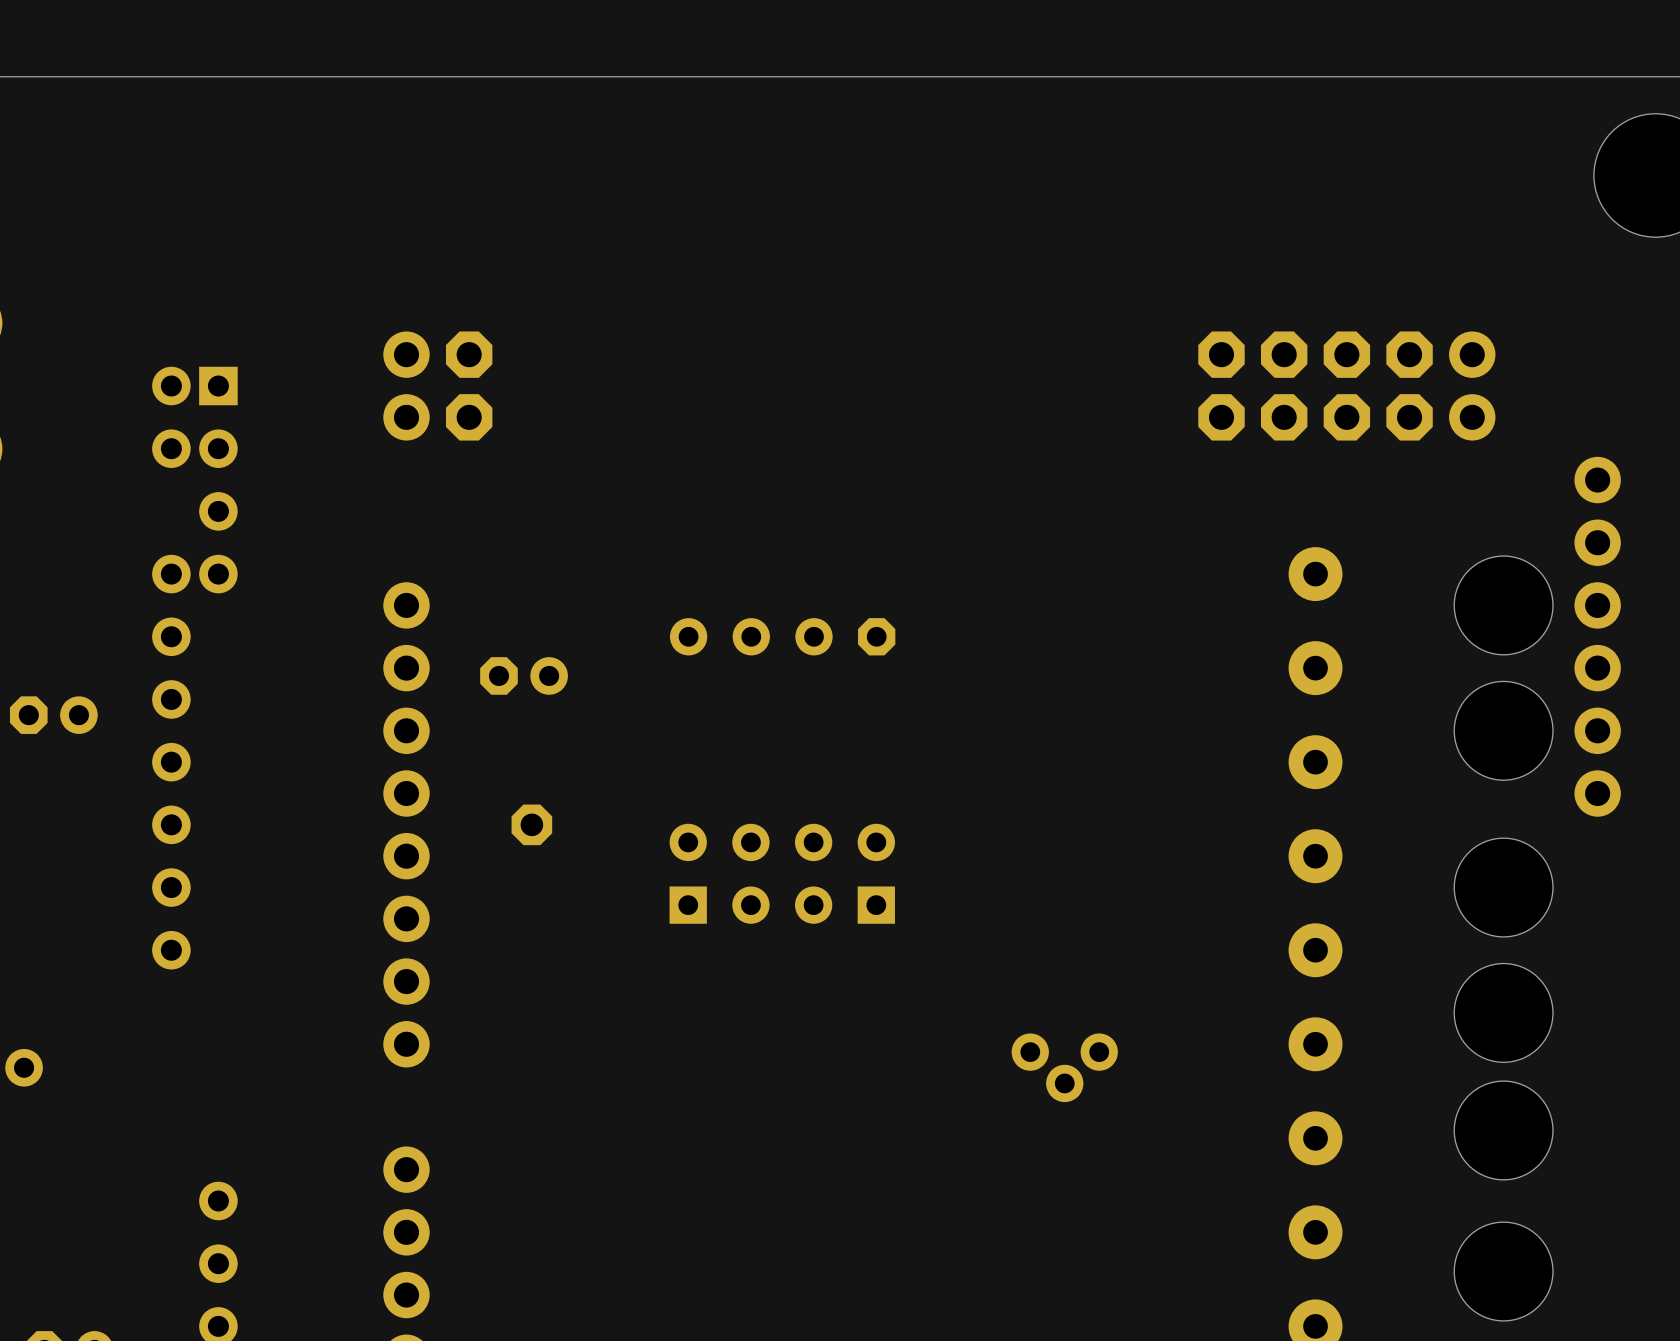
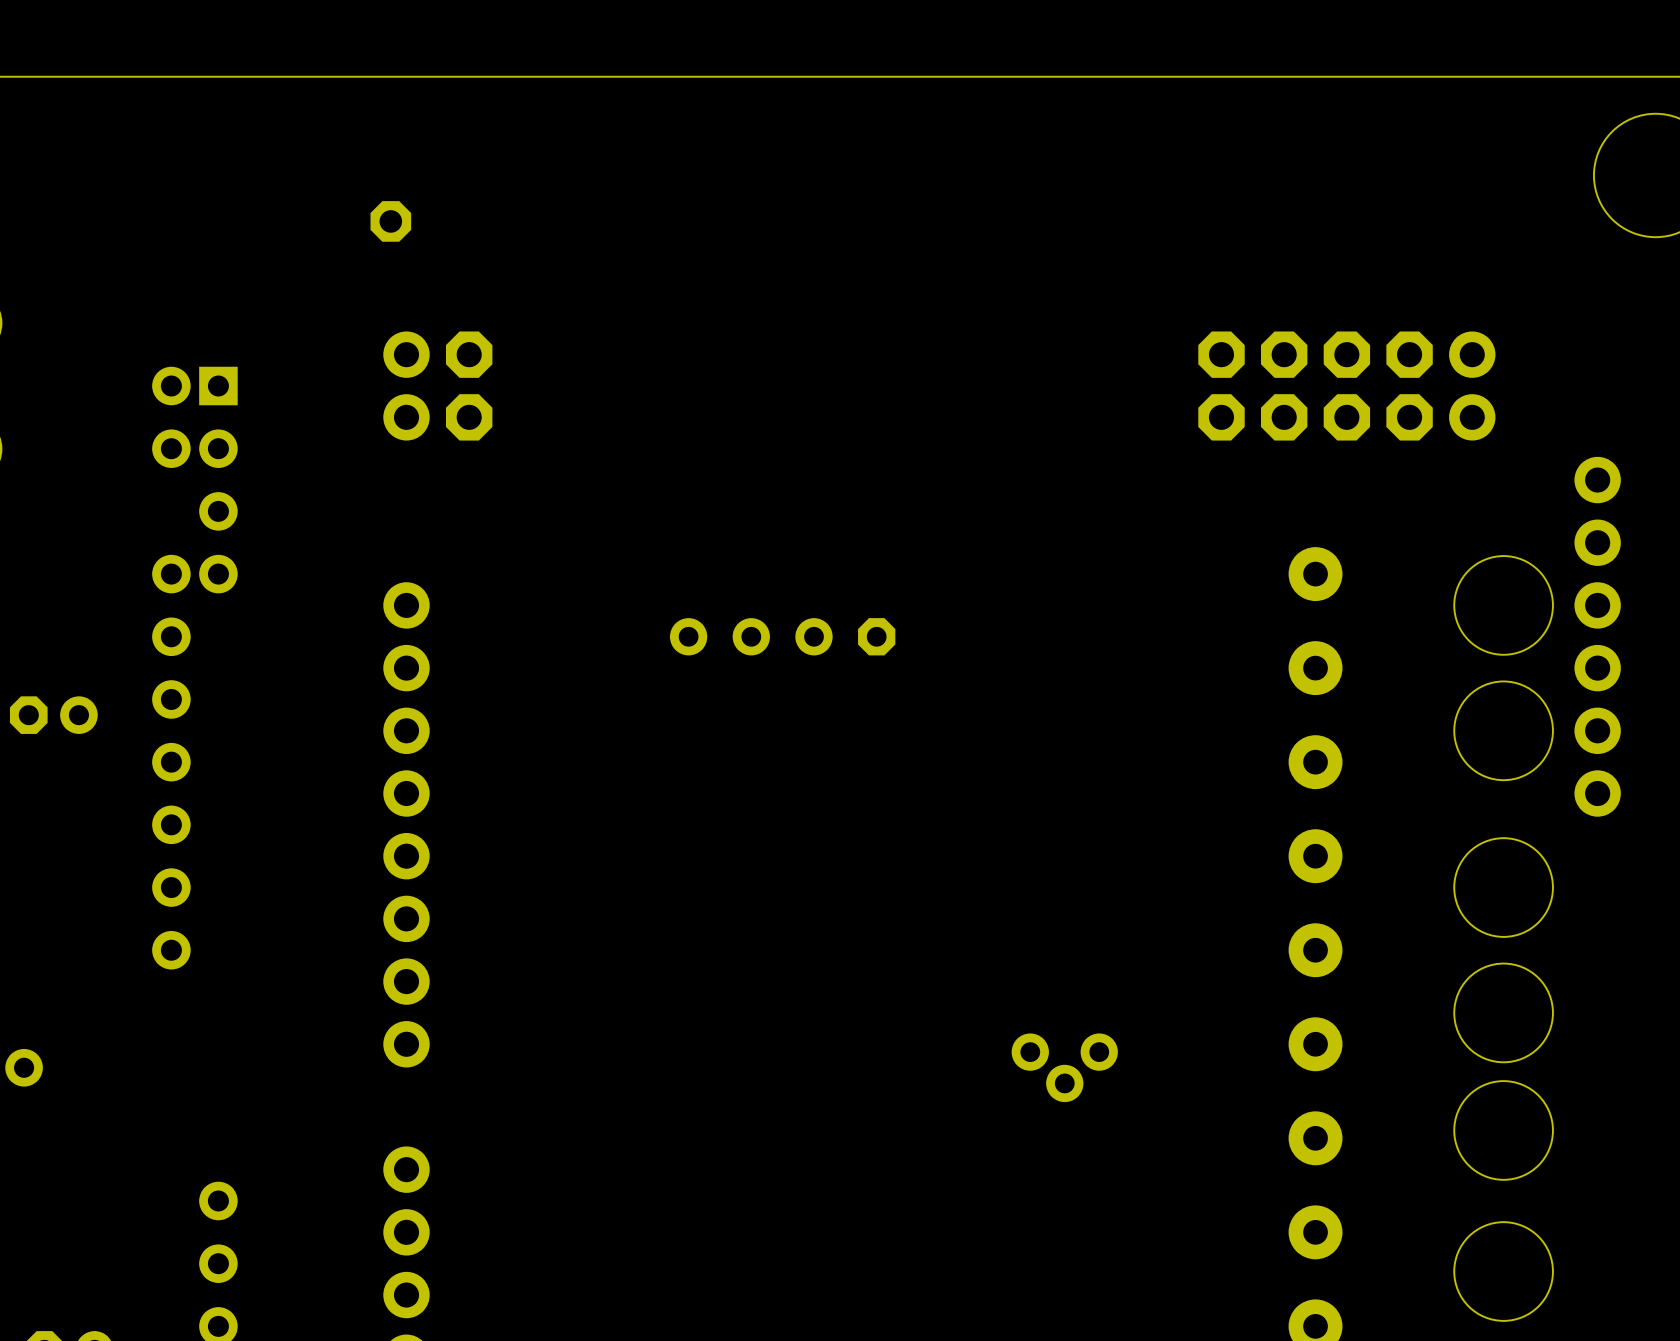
part: none -> (390, 221)
part: (524, 675) -> none
part: (531, 824) -> none
part: (782, 873) -> none

